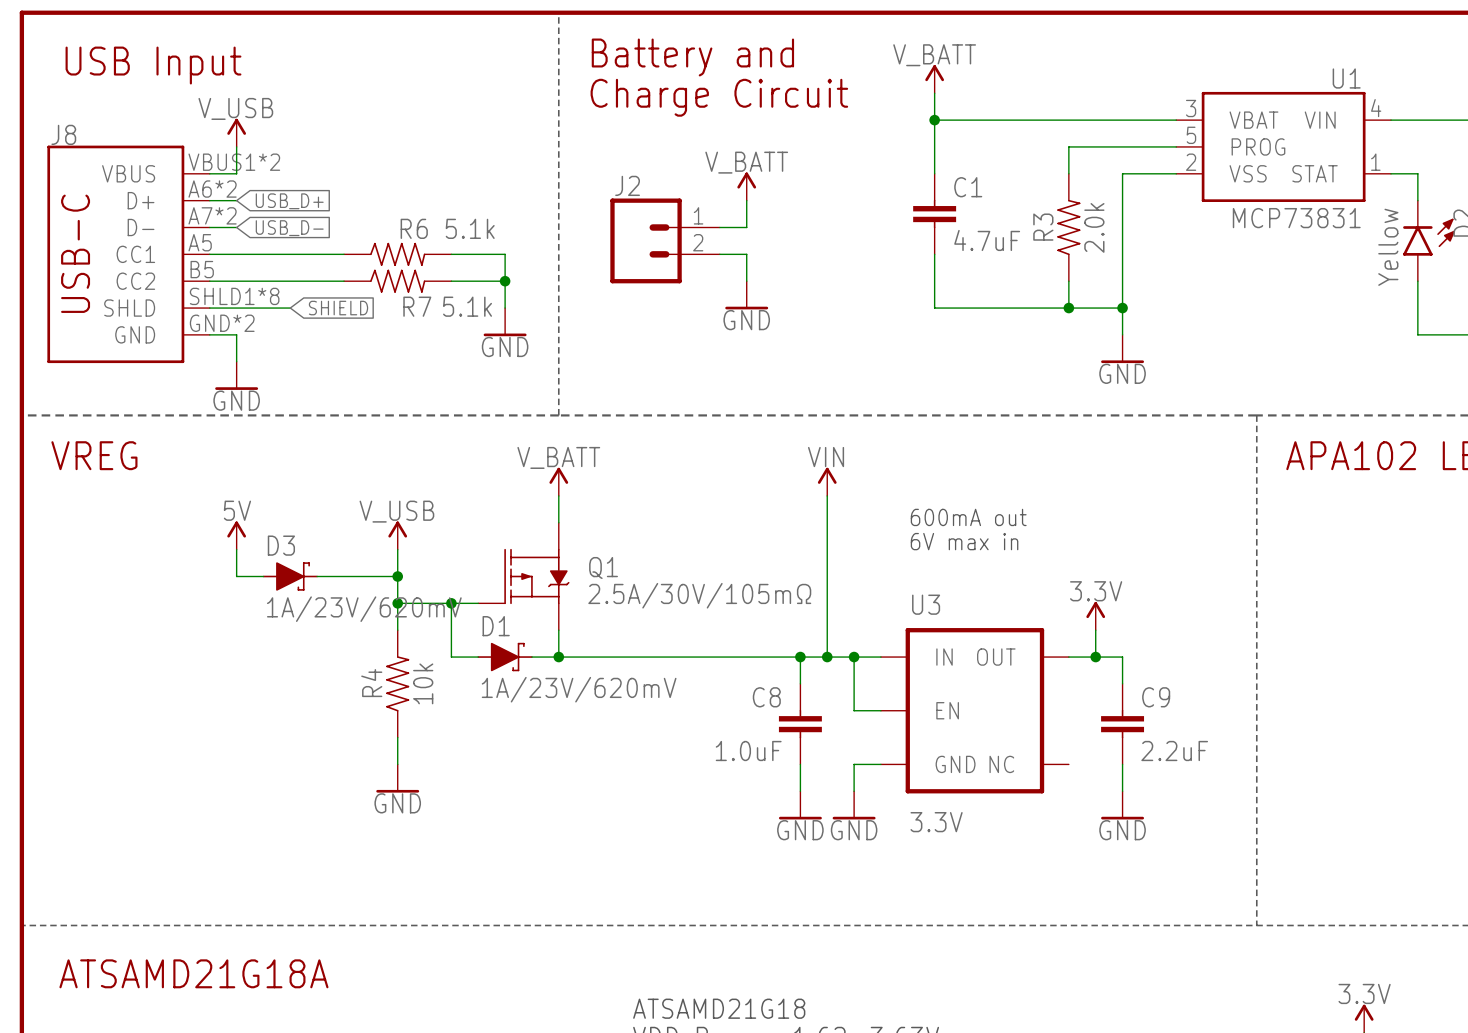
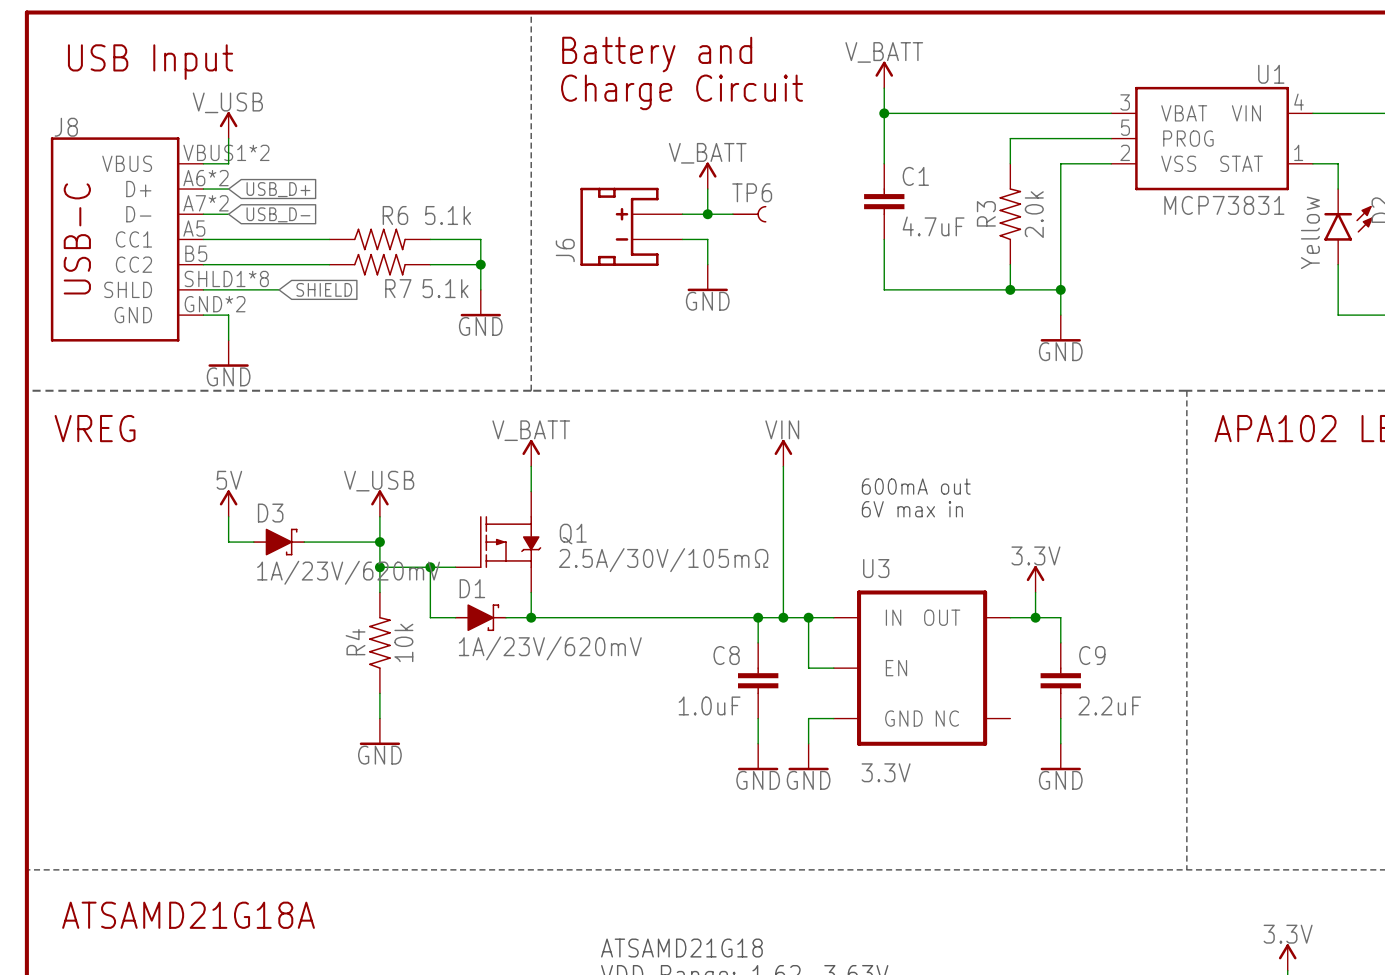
wire: none -> (707, 214) (732, 214)
junction: none -> (707, 214)
TP6: none -> (749, 214)
J2: (665, 240) -> none
J6: none -> (631, 226)

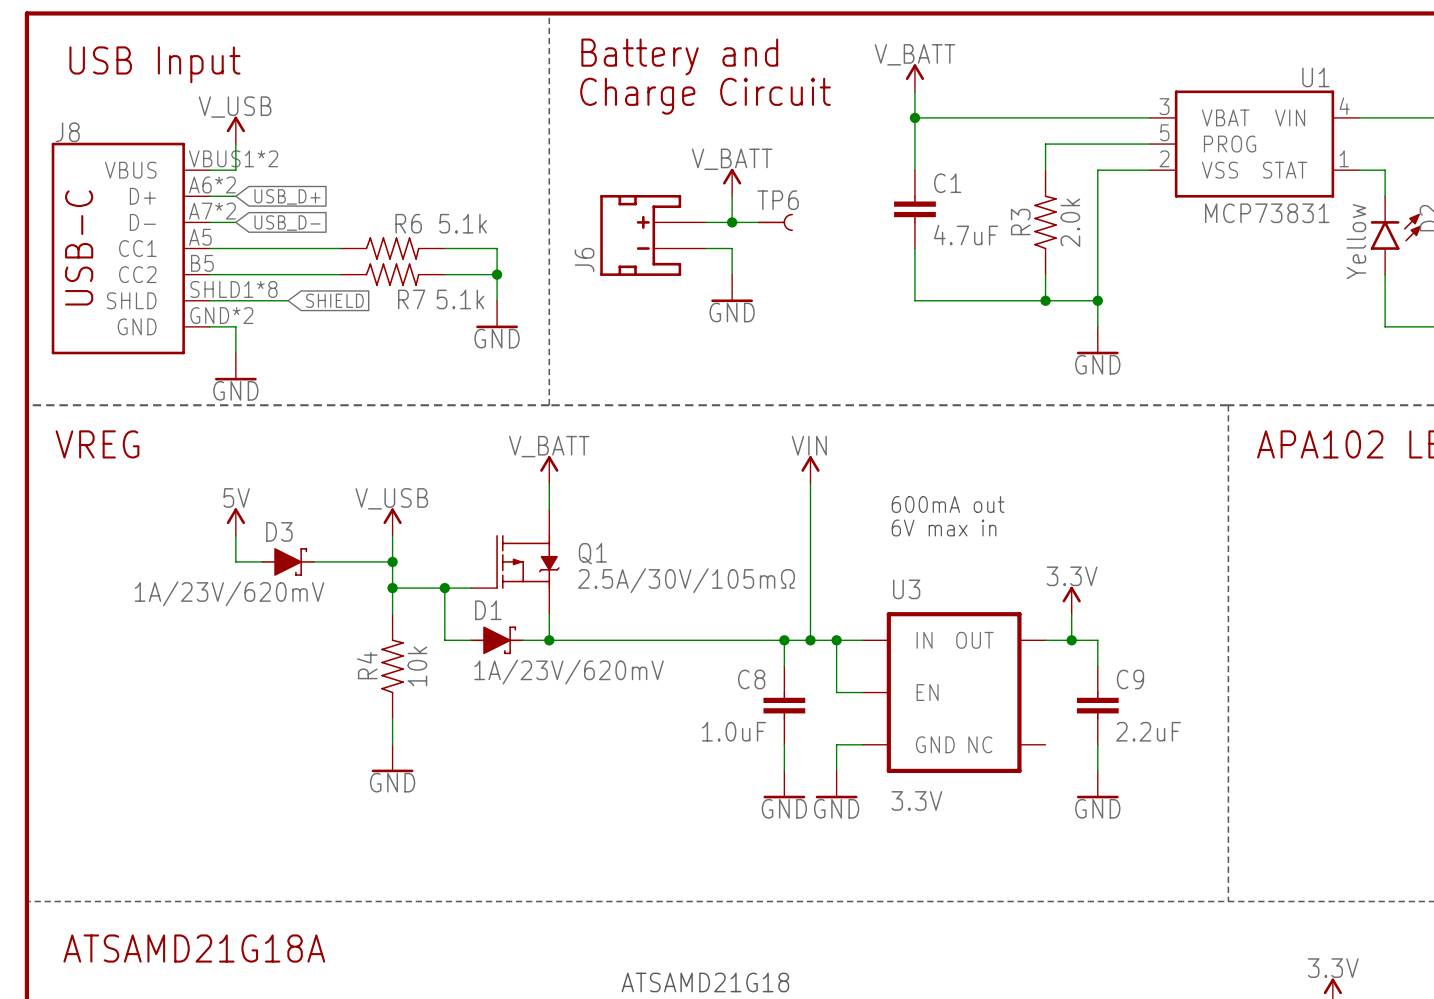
D3 value position: 1A/23V/620mV (348, 572) -> 1A/23V/620mV (229, 593)

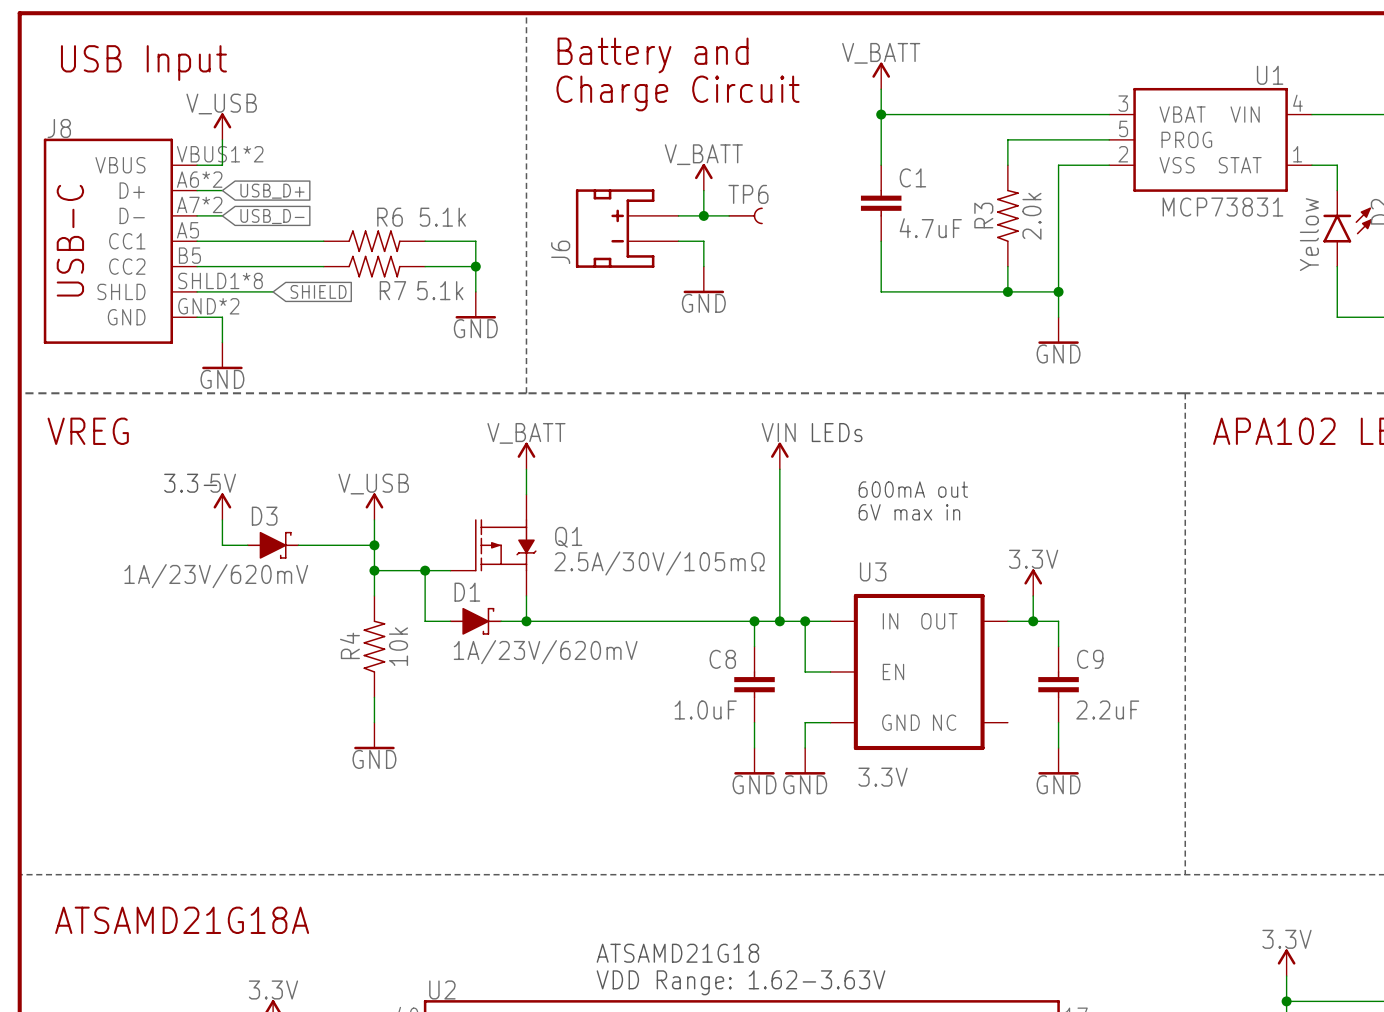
text: none -> LEDs (837, 432)
text: none -> 3.3- (190, 483)

